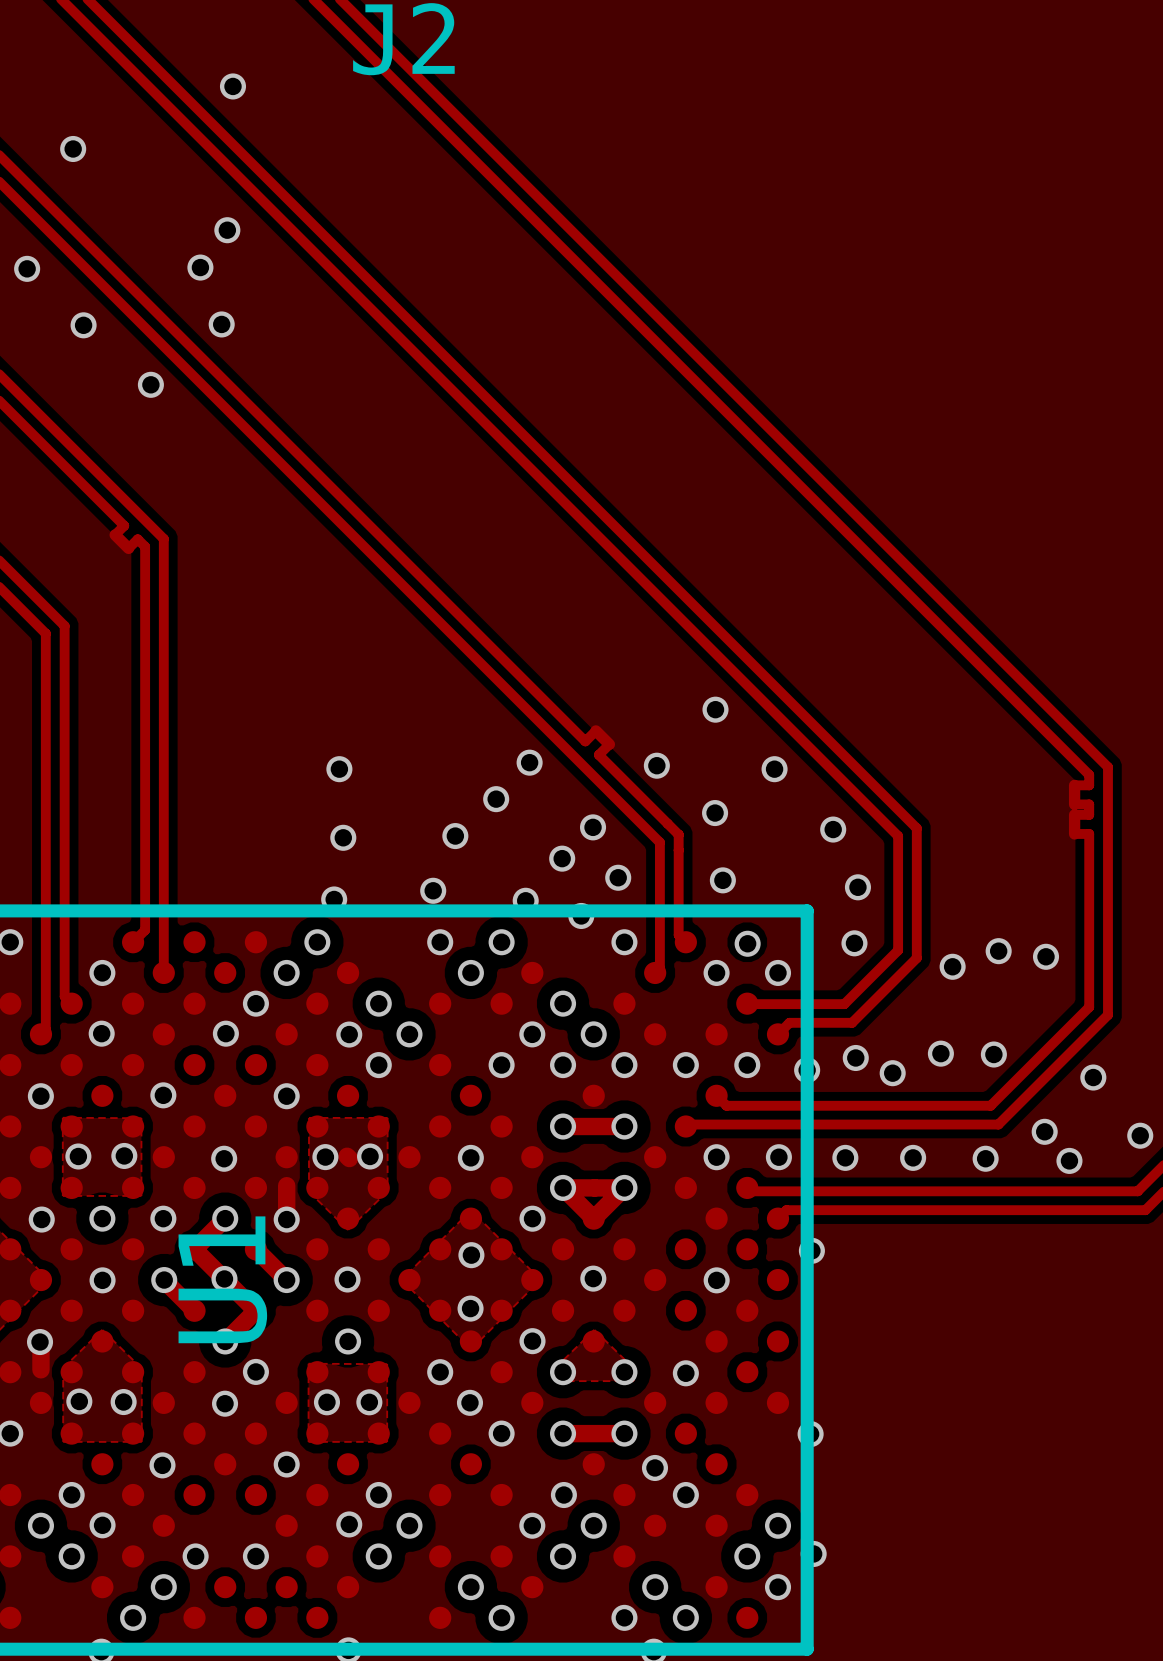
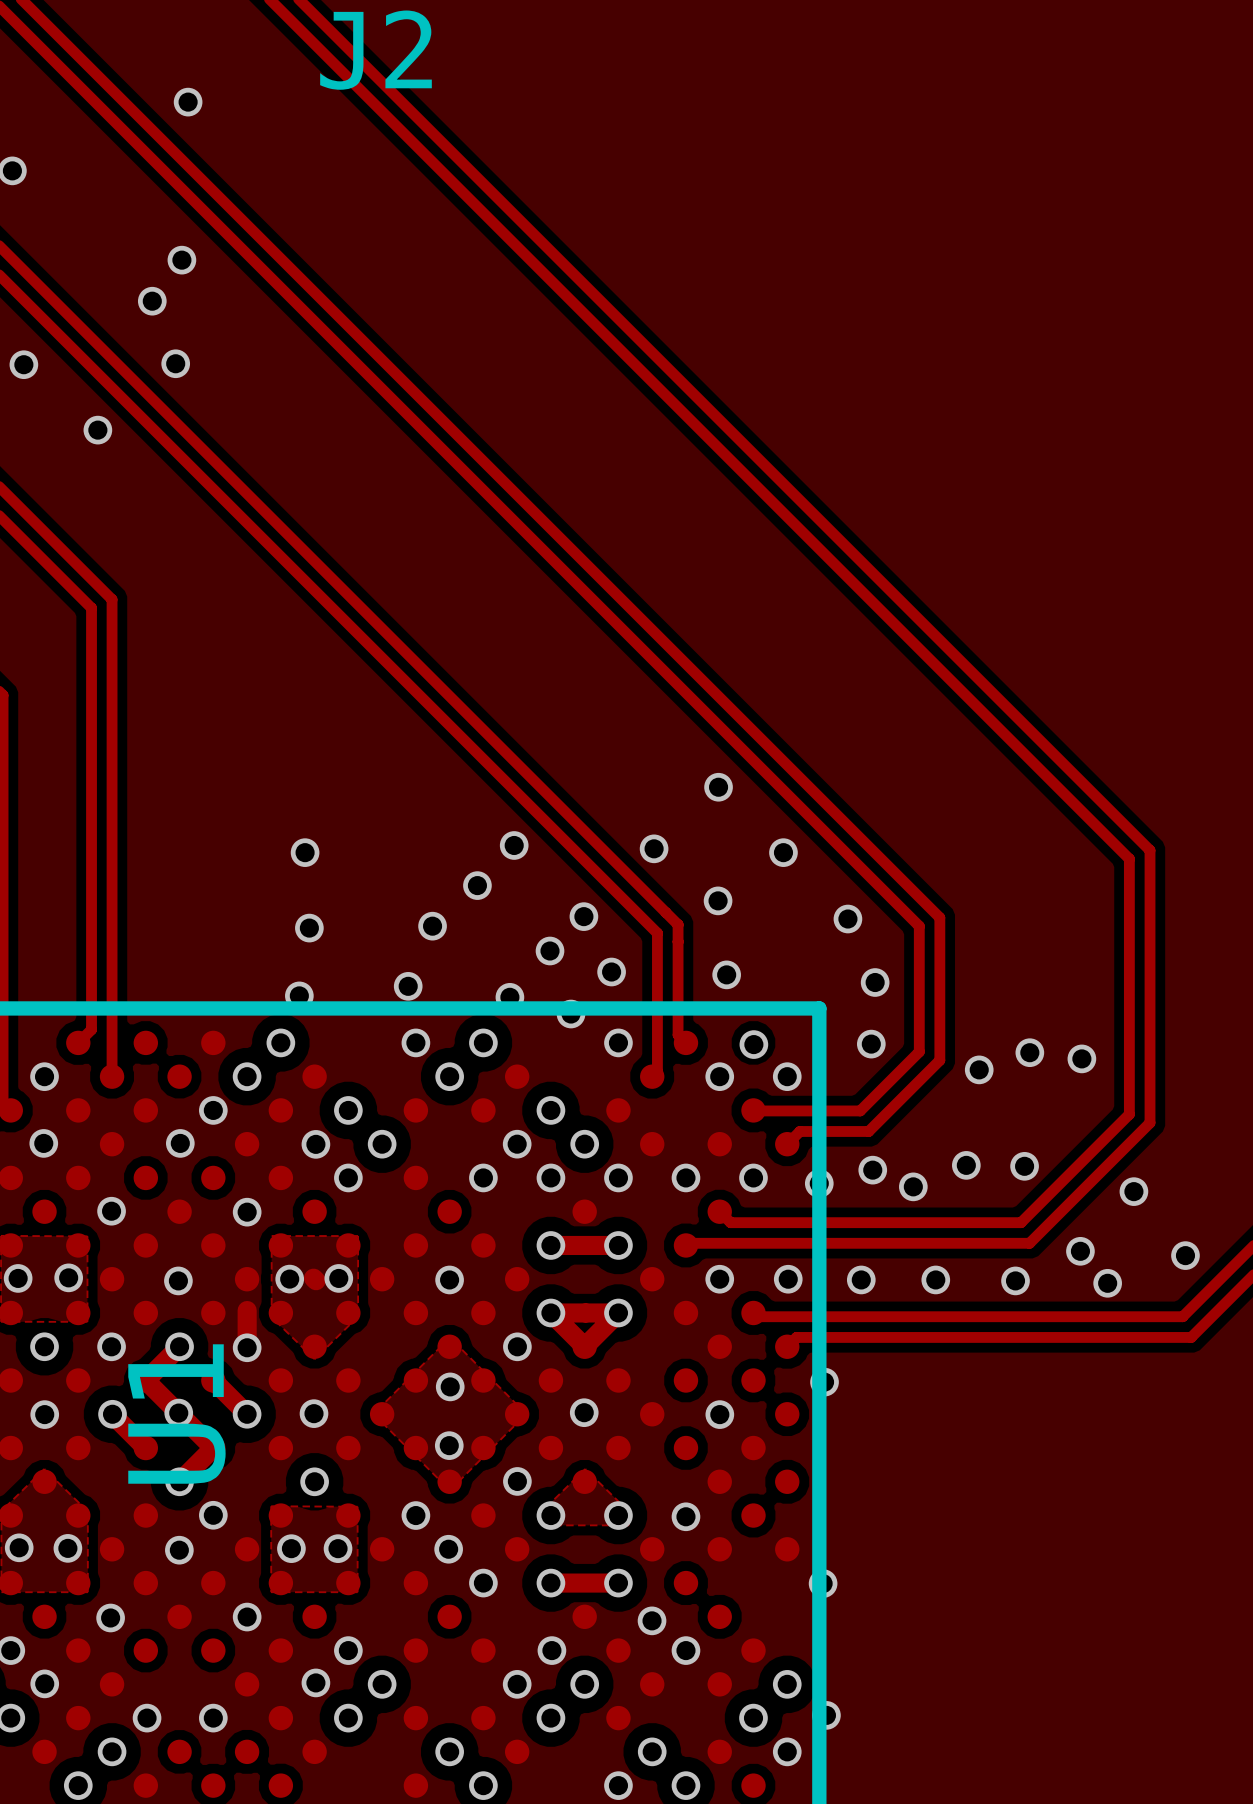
track: (124, 525) (115, 534) (128, 548) (137, 539) -> (68, 585) (83, 599)
track: (585, 741) (595, 730) (609, 744) (598, 754) -> (575, 822) (590, 836)
track: (1089, 785) (1074, 785) (1074, 804) (1089, 804) -> (1129, 870) (1129, 891)
track: (1089, 814) (1074, 814) (1074, 833) (1089, 833) -> (1129, 902) (1129, 923)

